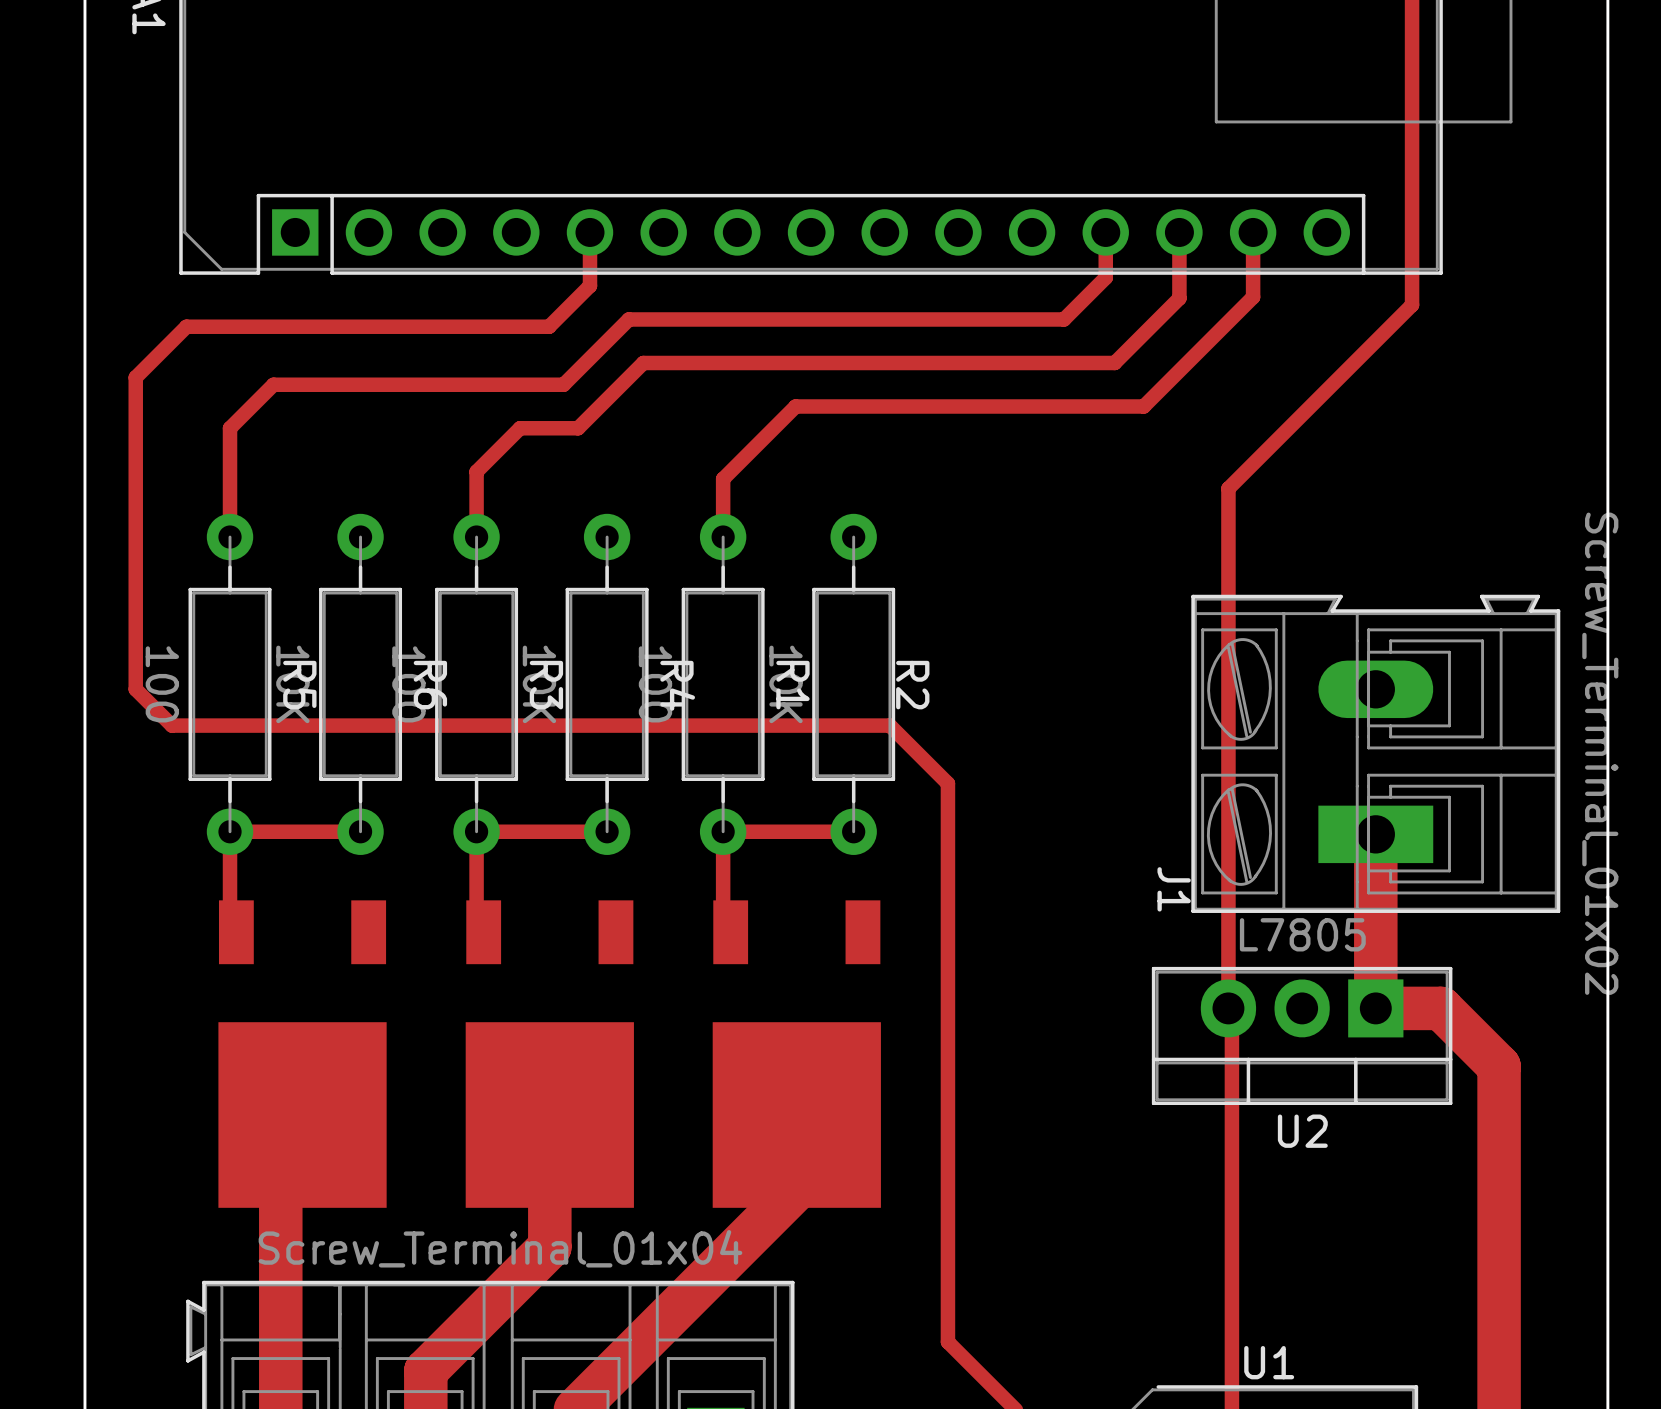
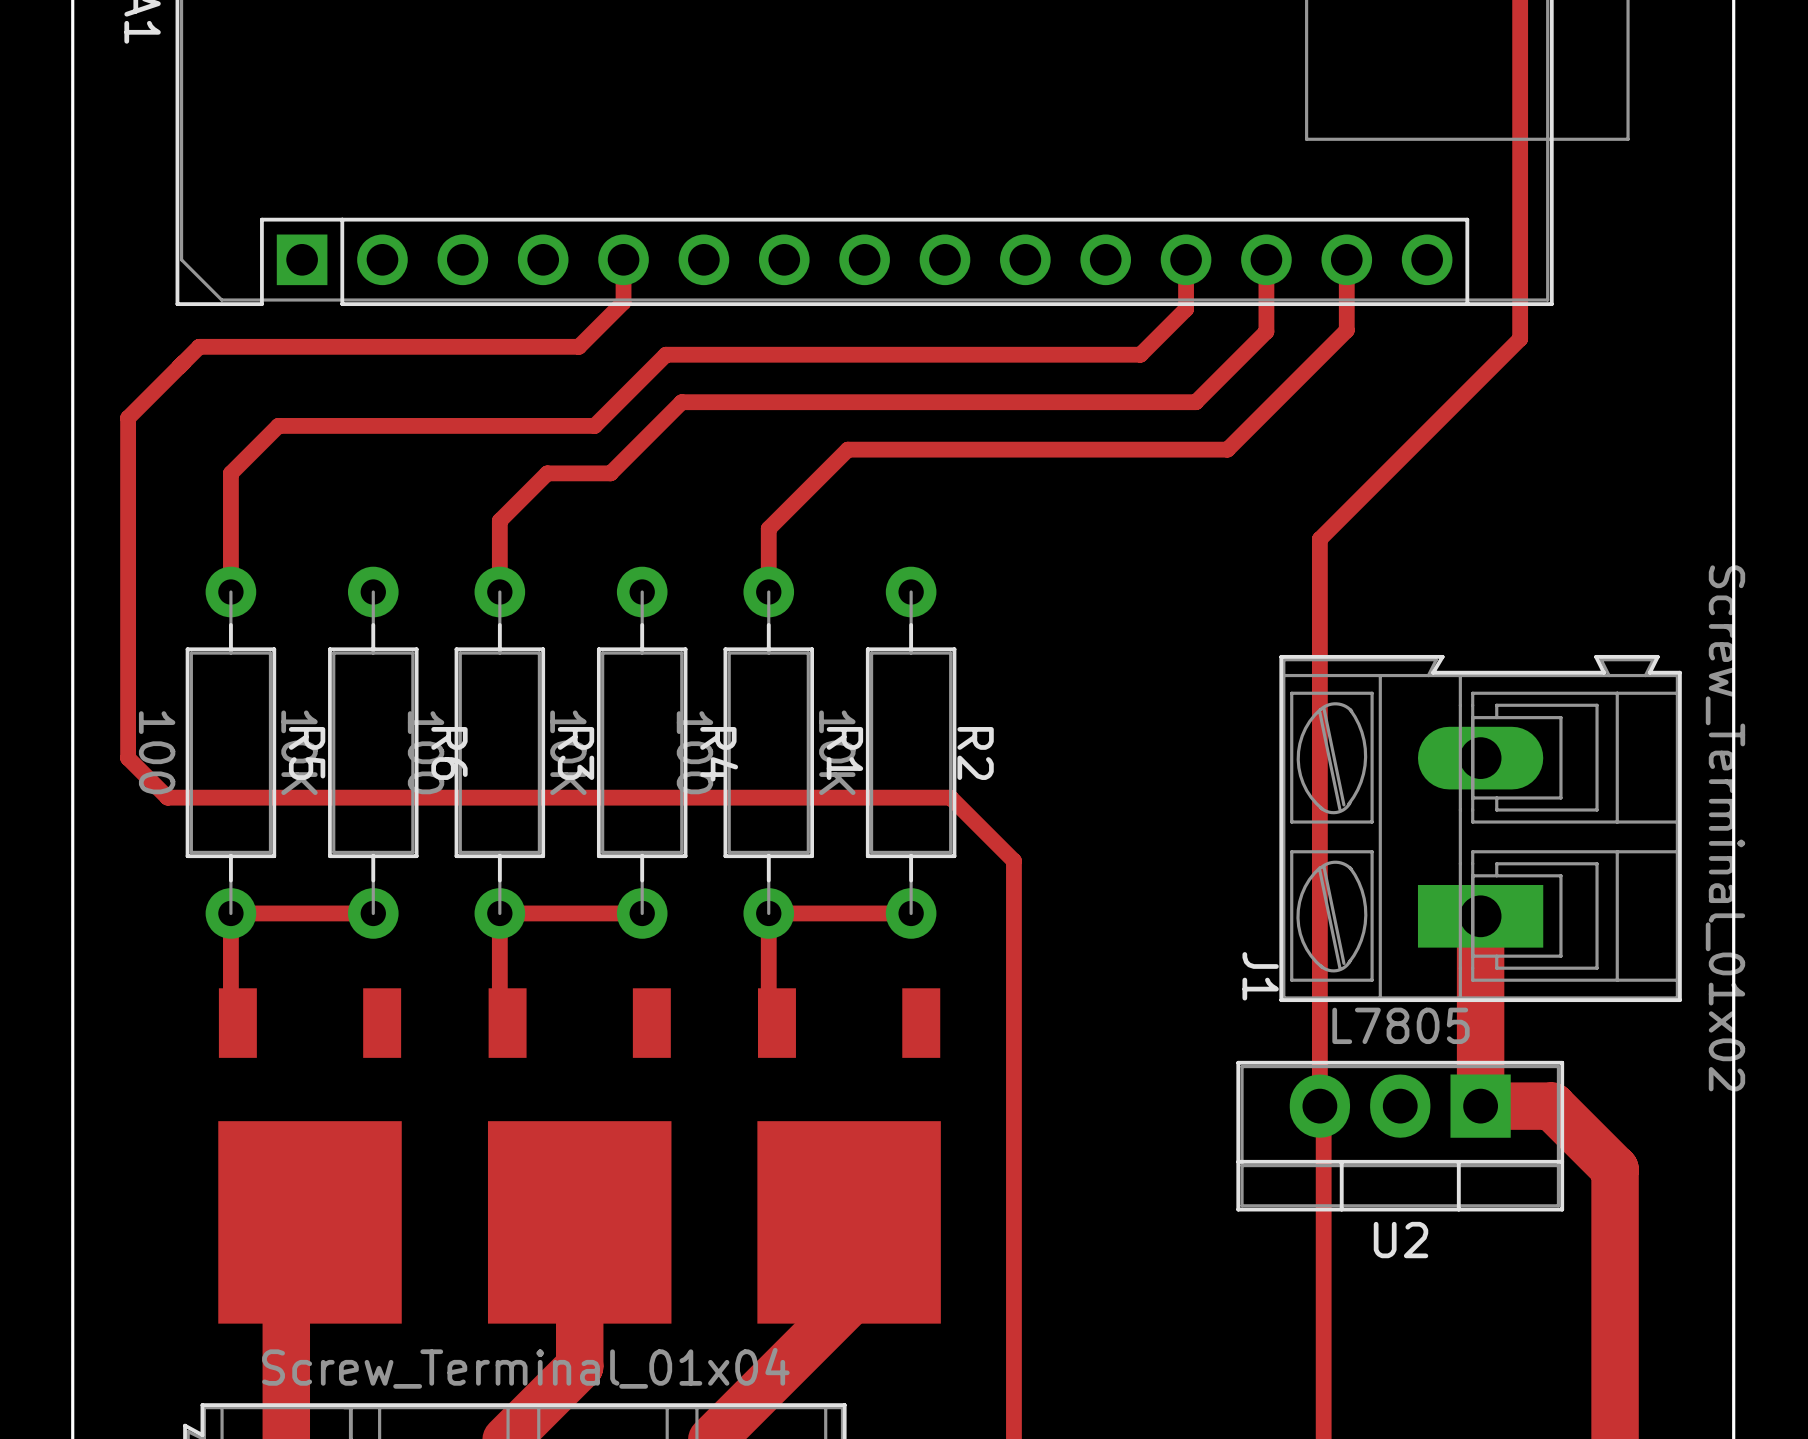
top track: (589, 271) (589, 285) (549, 326) (186, 326) -> (623, 302) (578, 346) (199, 346) (183, 362)

